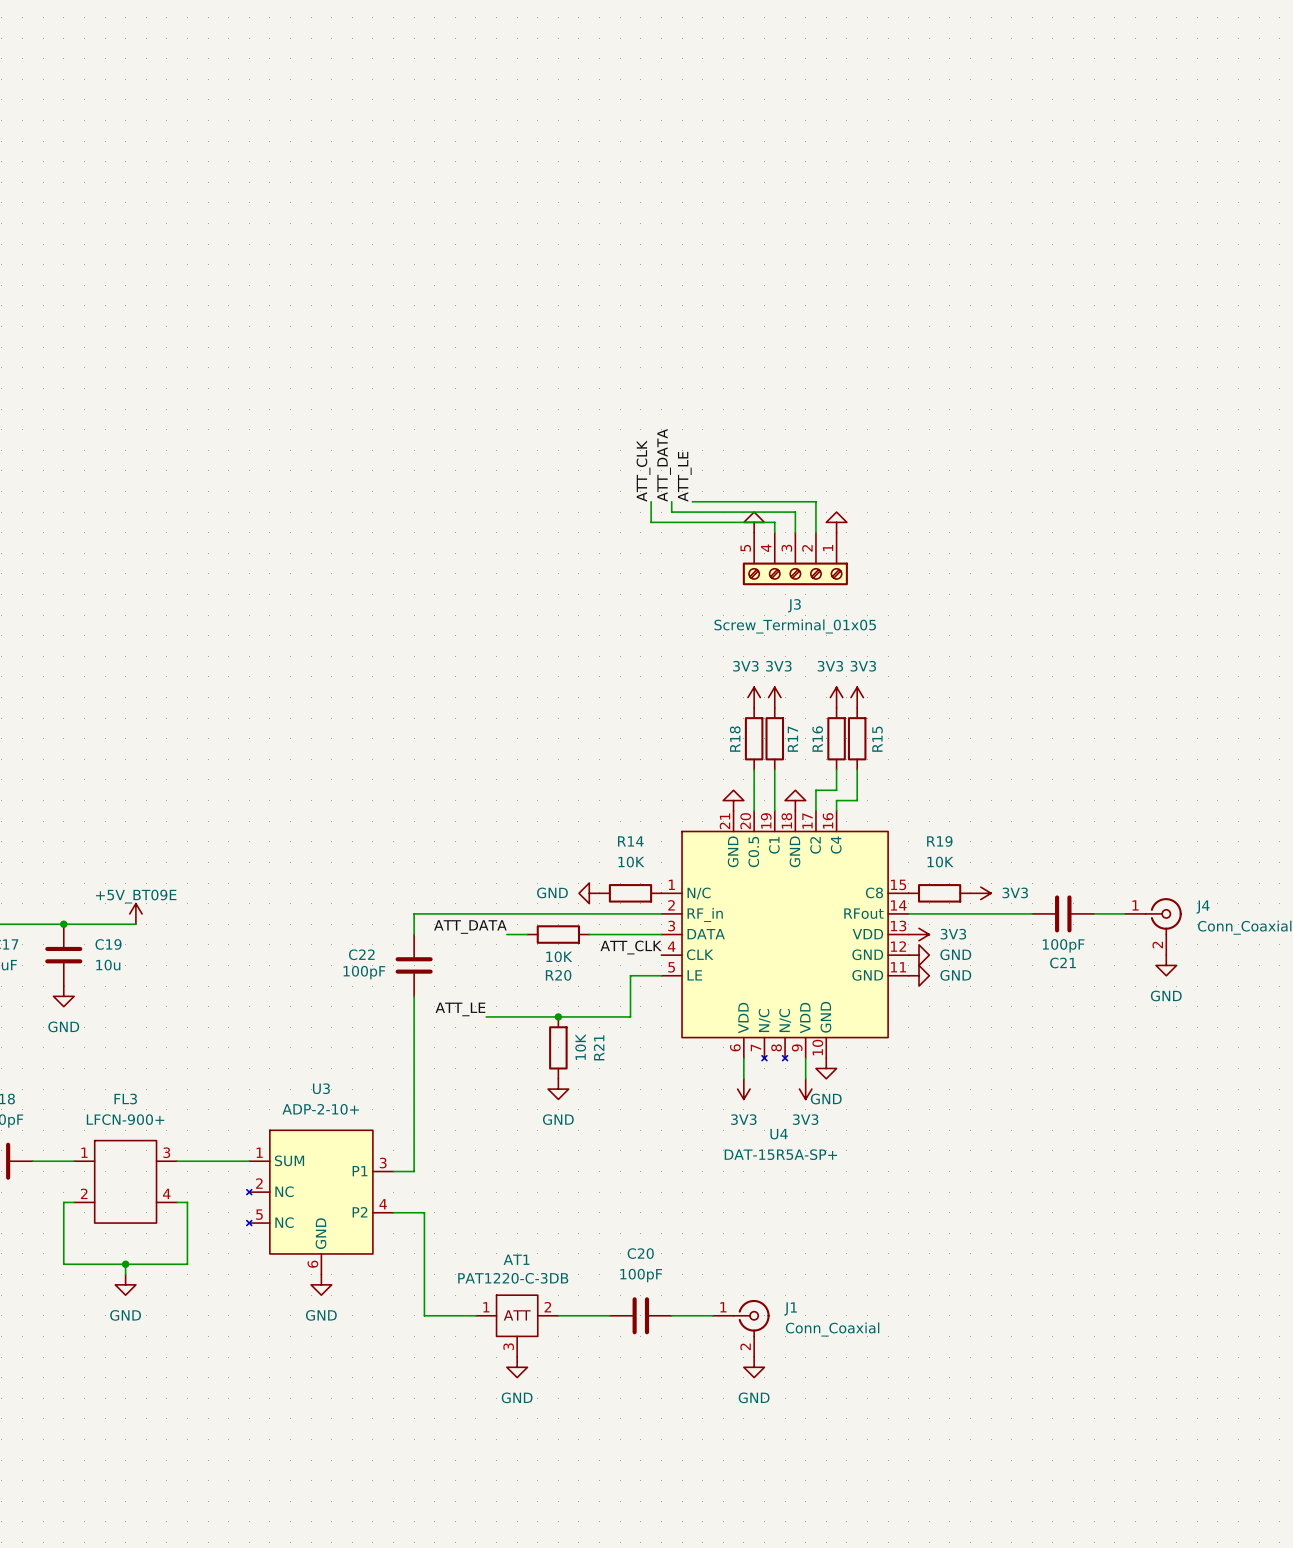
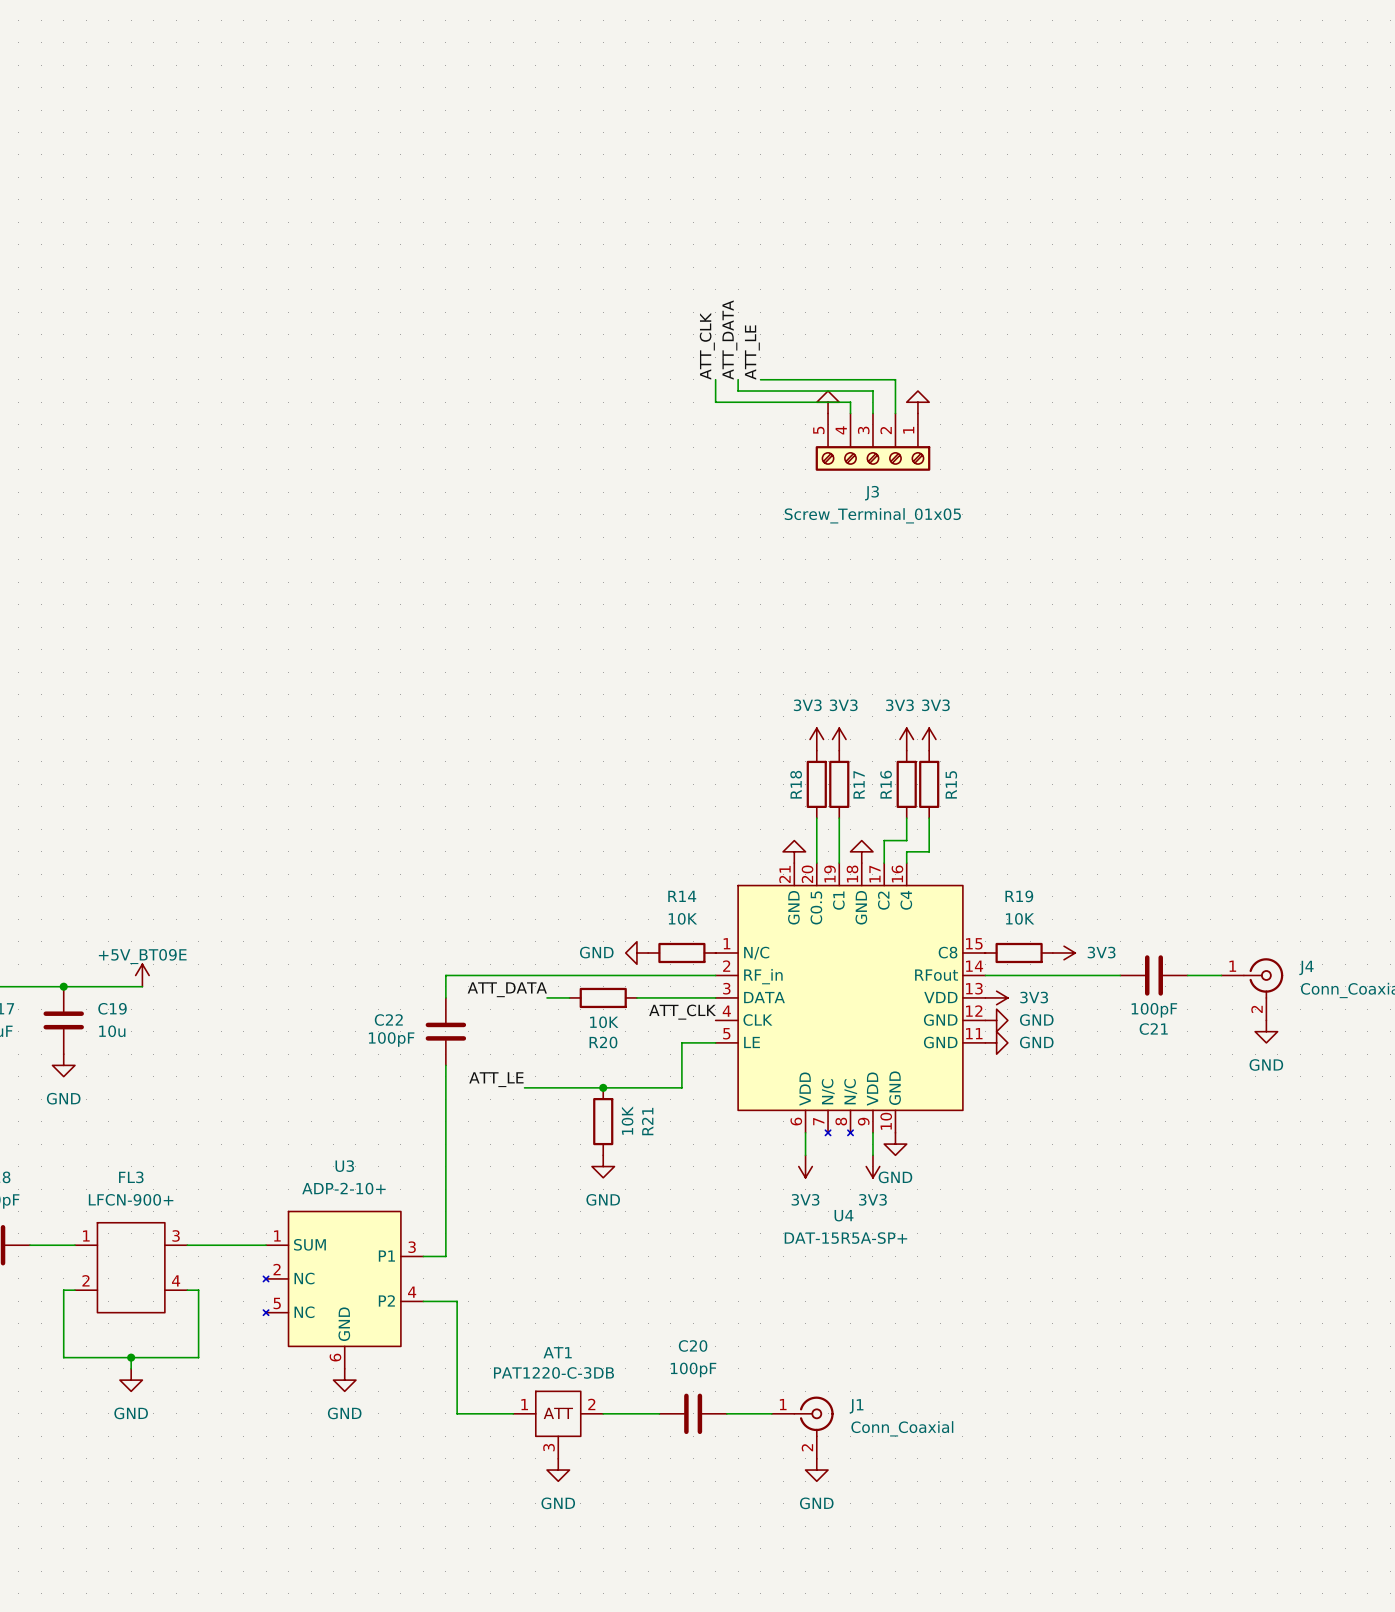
power symbol: none -> (828, 402)
power symbol: none -> (917, 402)
label position: ATT_DATA (664, 465) -> ATT_DATA (729, 340)
label position: ATT_CLK (643, 471) -> ATT_CLK (707, 346)
label position: ATT_LE (684, 476) -> ATT_LE (752, 352)
wire: (651, 501) (651, 522) (774, 522) (774, 532) -> (715, 379) (715, 402) (850, 402) (850, 413)
wire: (671, 501) (671, 512) (795, 512) (795, 532) -> (738, 379) (738, 391) (872, 391) (872, 413)
wire: (692, 501) (815, 501) (815, 532) -> (760, 379) (895, 379) (895, 413)
power symbol: (754, 522) -> none
power symbol: (836, 522) -> none
J3 position: (795, 558) -> (872, 442)

